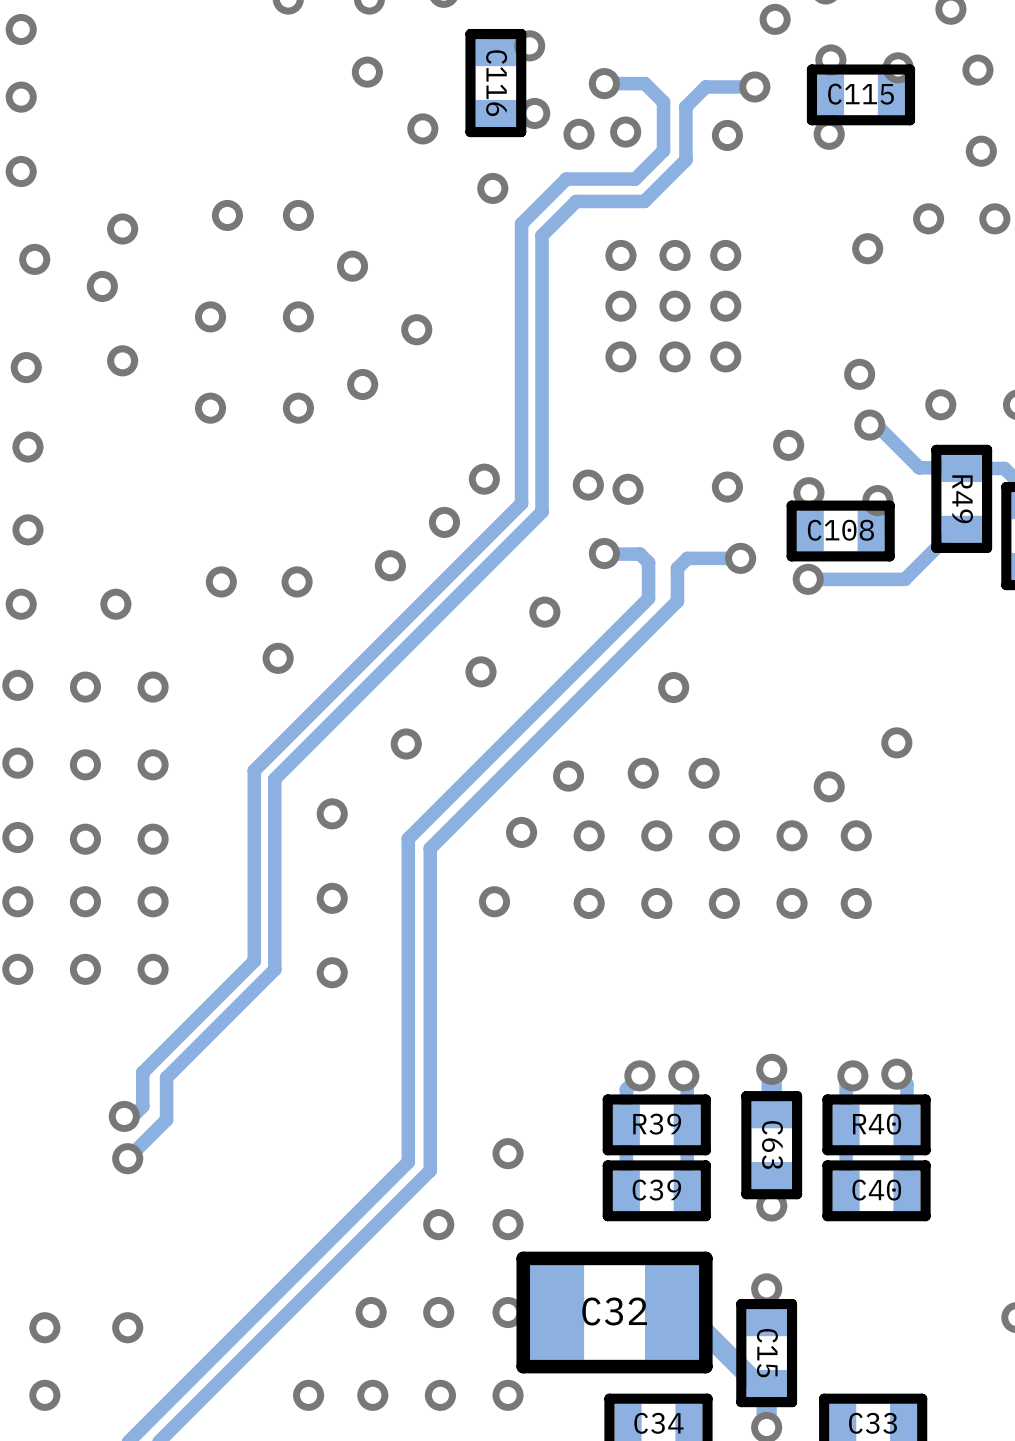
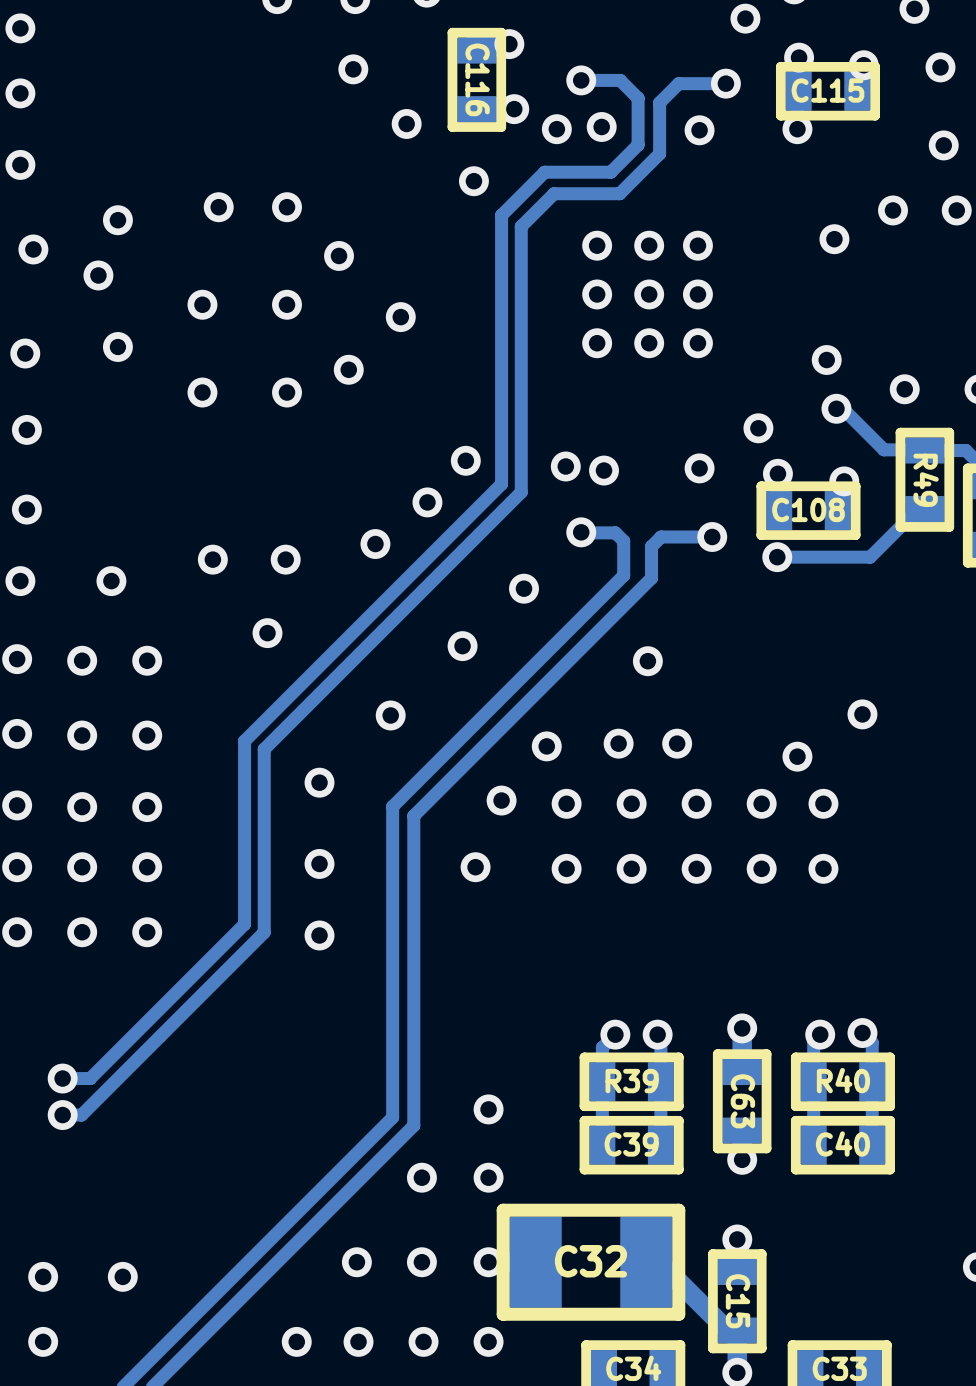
track: (142, 1072) (142, 1106) (132, 1116) (124, 1116) -> (137, 1031) (90, 1078) (62, 1078)
track: (166, 1077) (166, 1119) (127, 1158) -> (160, 1036) (81, 1115) (62, 1115)
via: (124, 1116) -> none
via: none -> (62, 1078)
via: (127, 1158) -> none
via: none -> (62, 1115)

